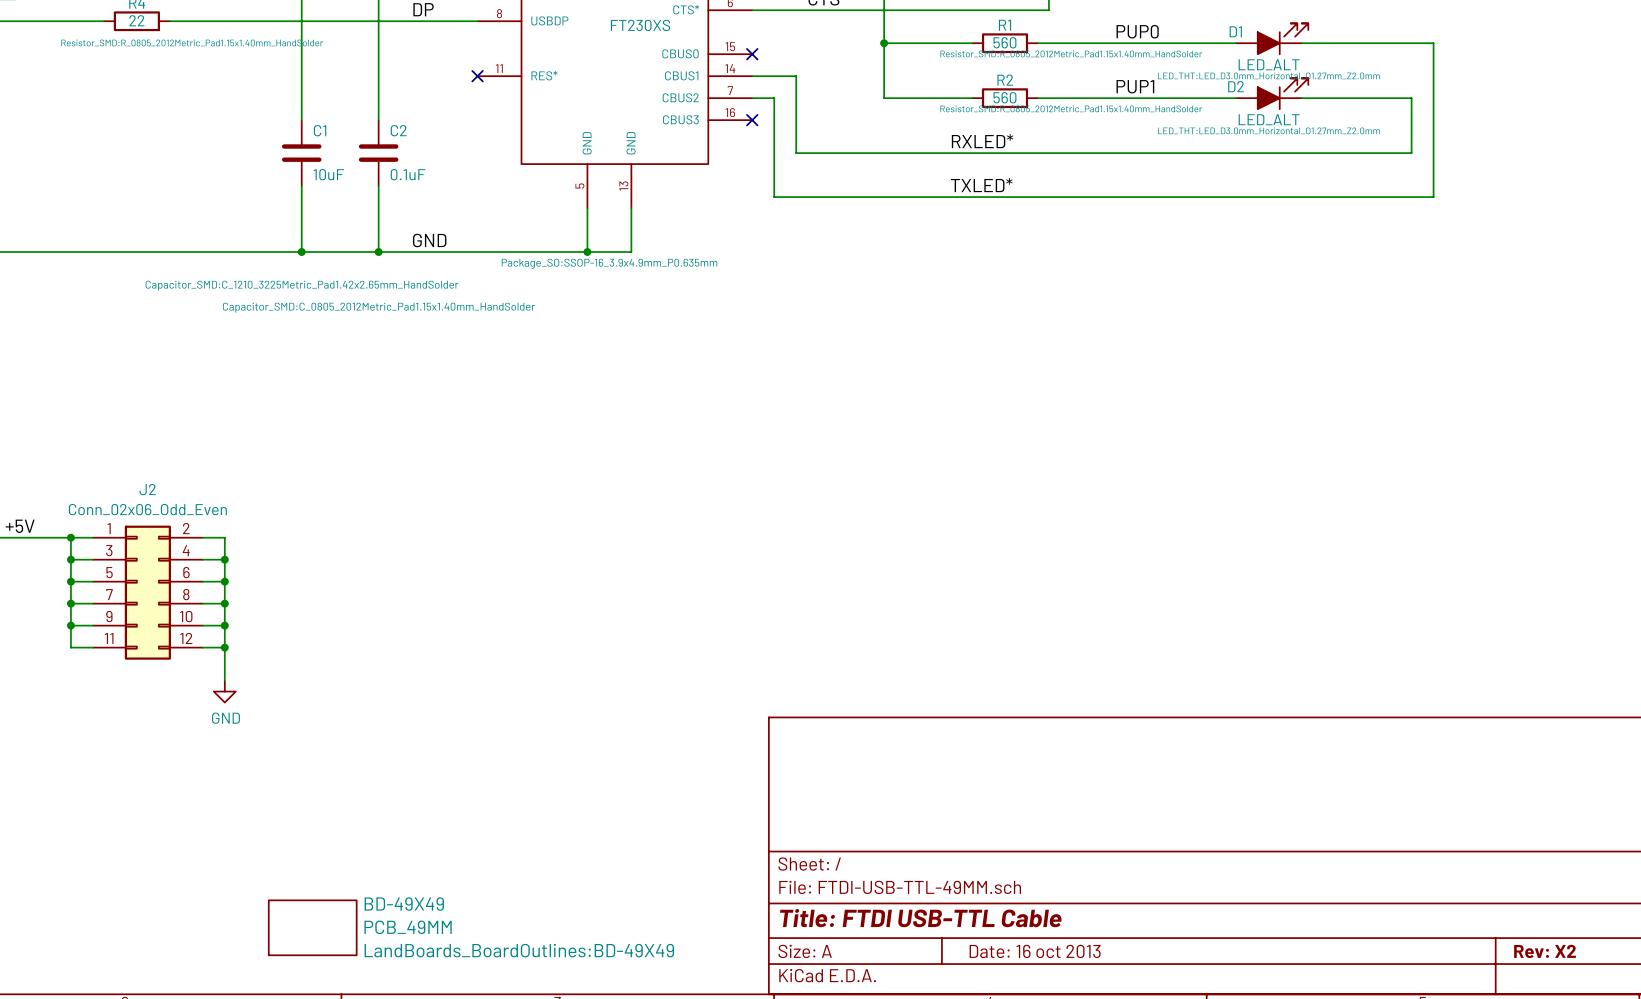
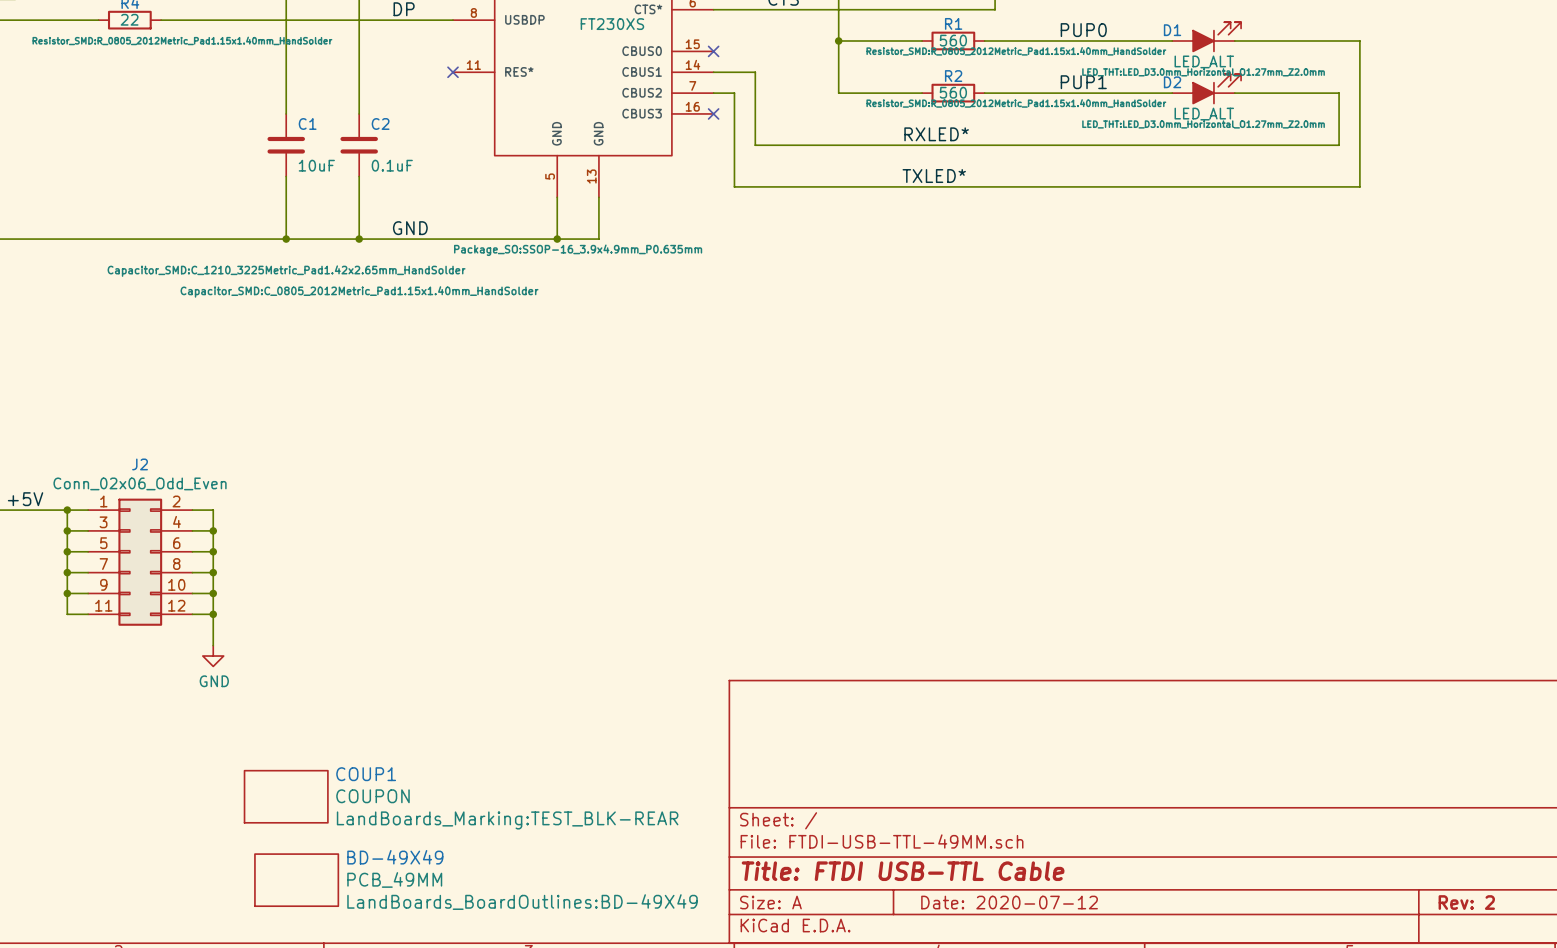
COUP1: none -> COUPON (286, 796)
title block: Date: 16 oct 2013 (1035, 951) -> Date: 2020-07-12 (1009, 902)
title block: Rev: X2 (1545, 951) -> Rev: 2 (1466, 902)

